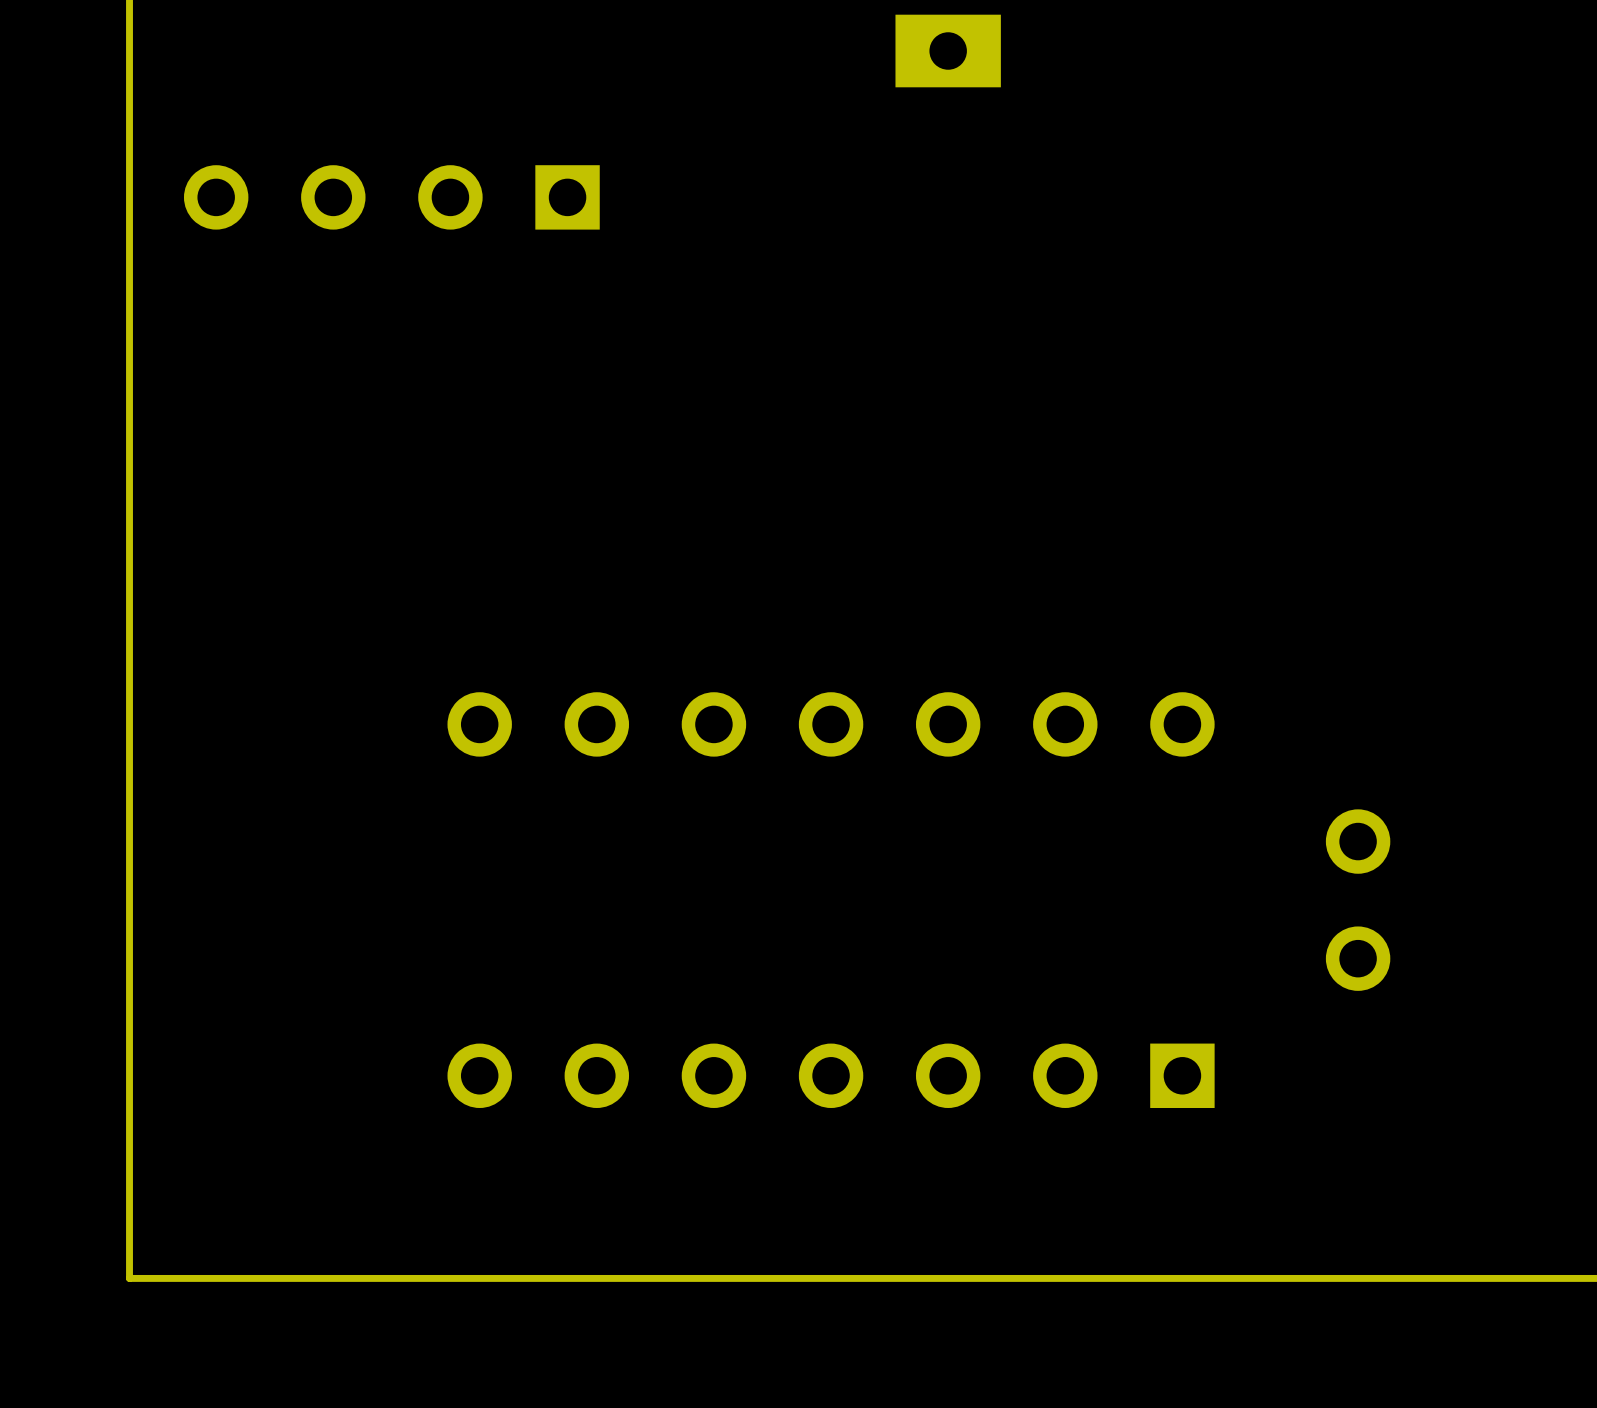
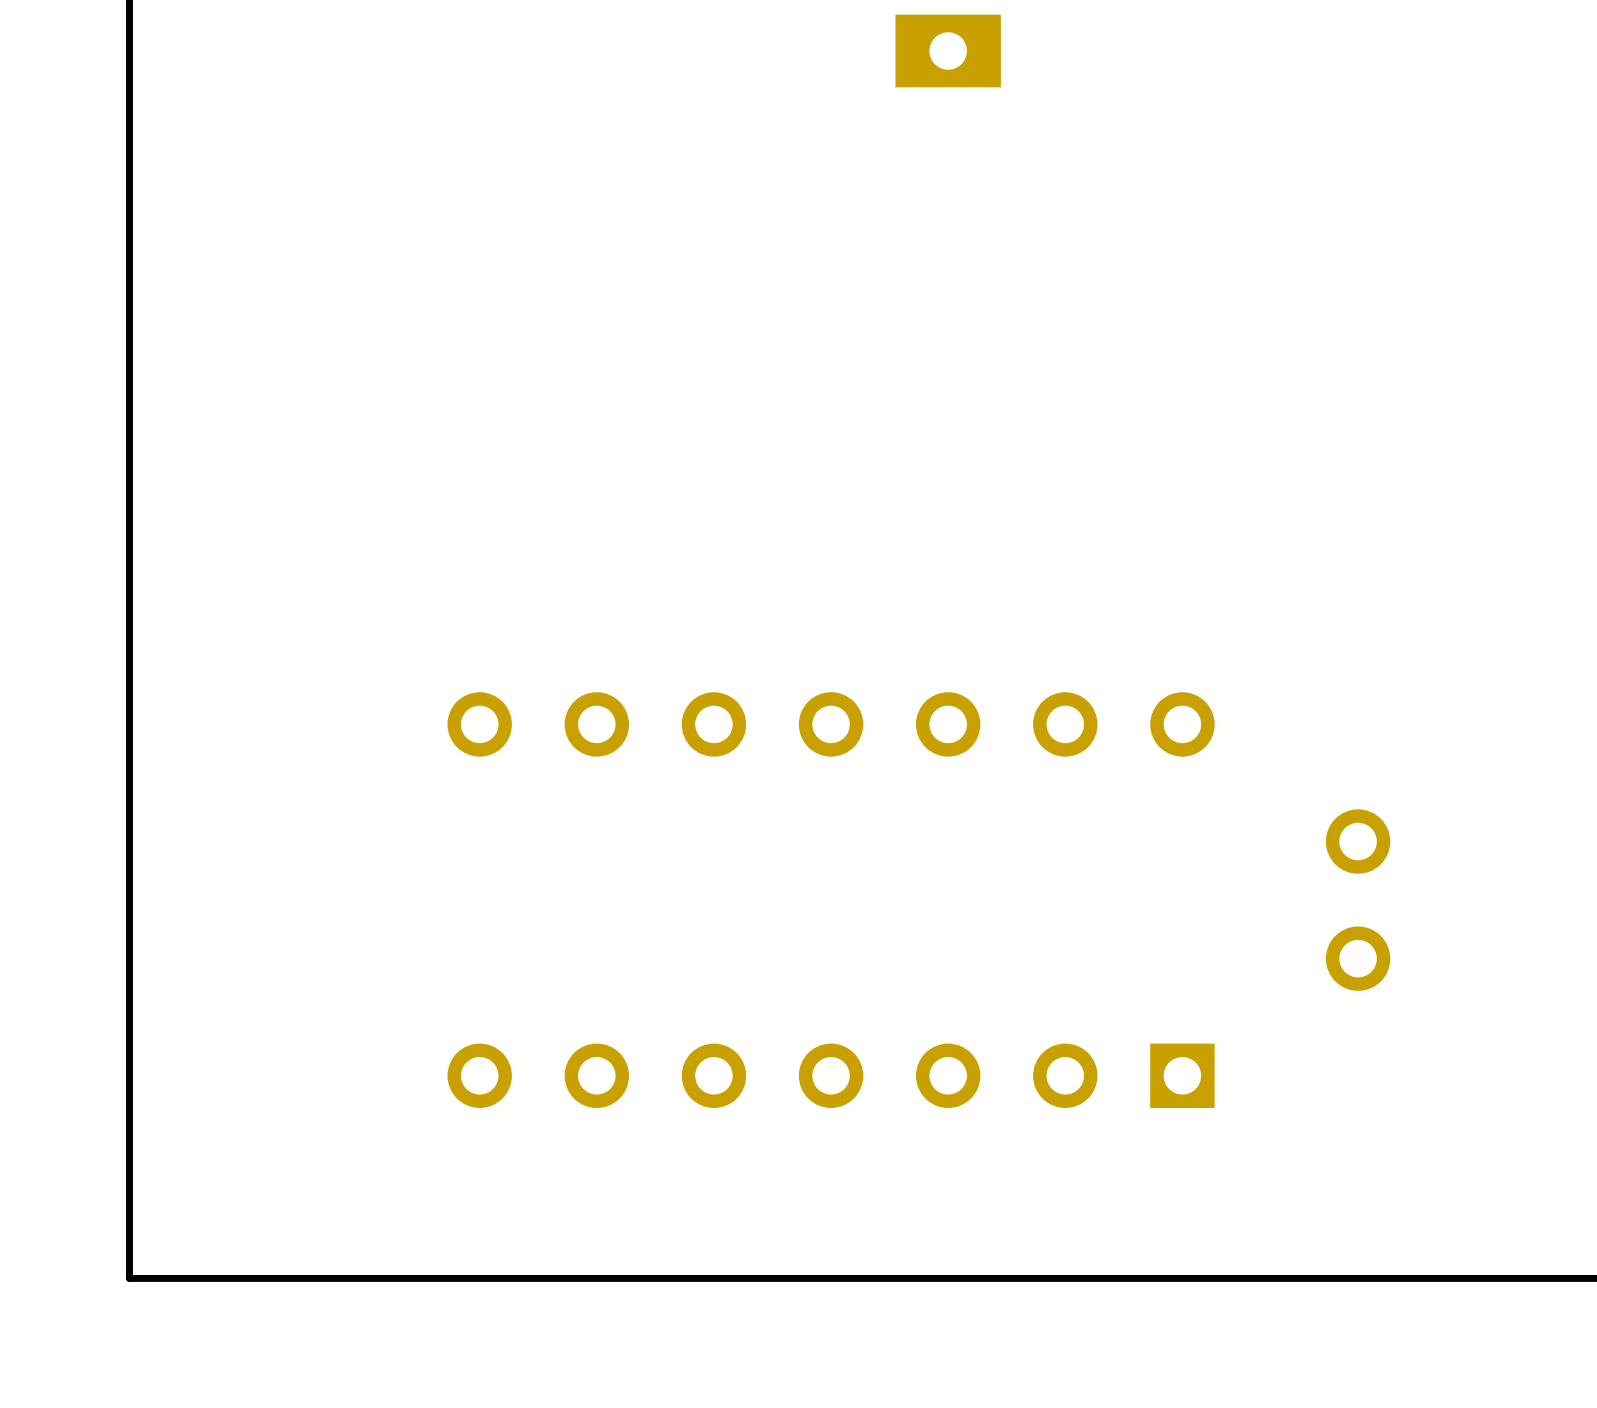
part: (391, 197) -> none

